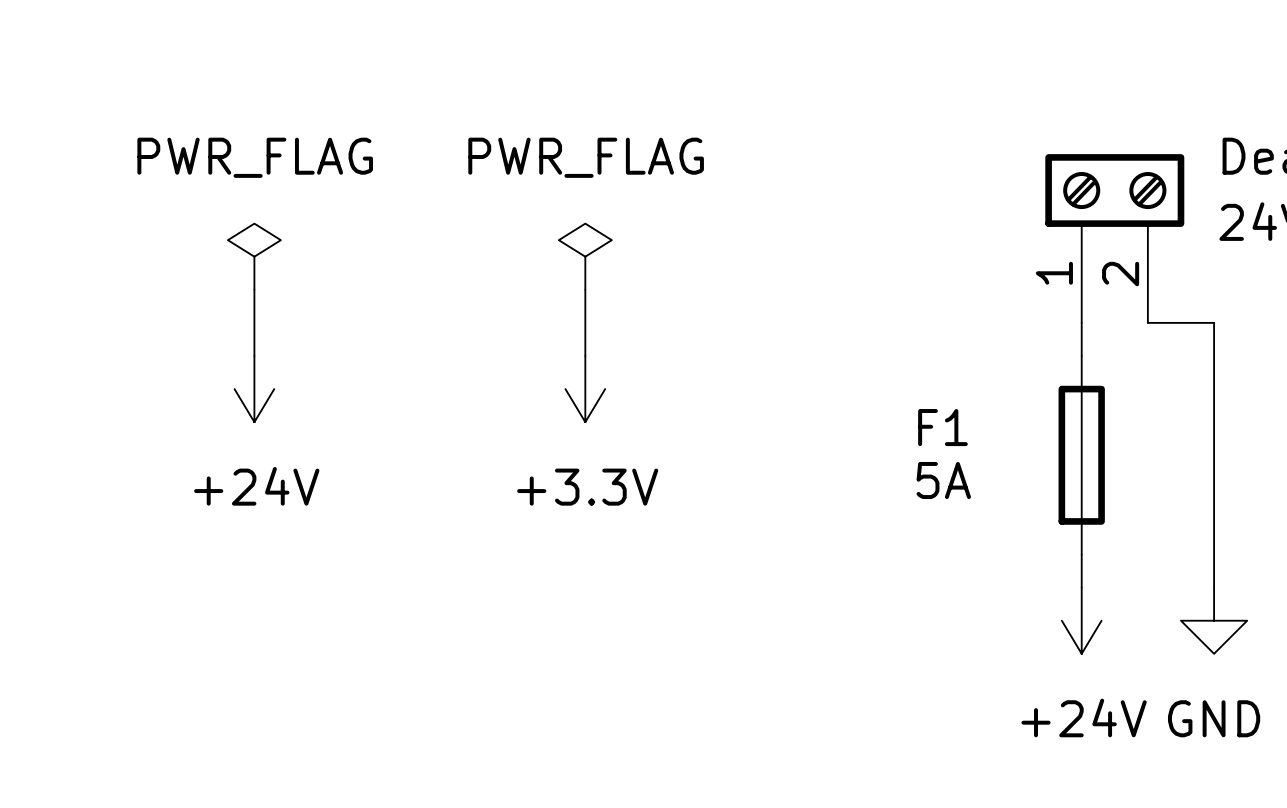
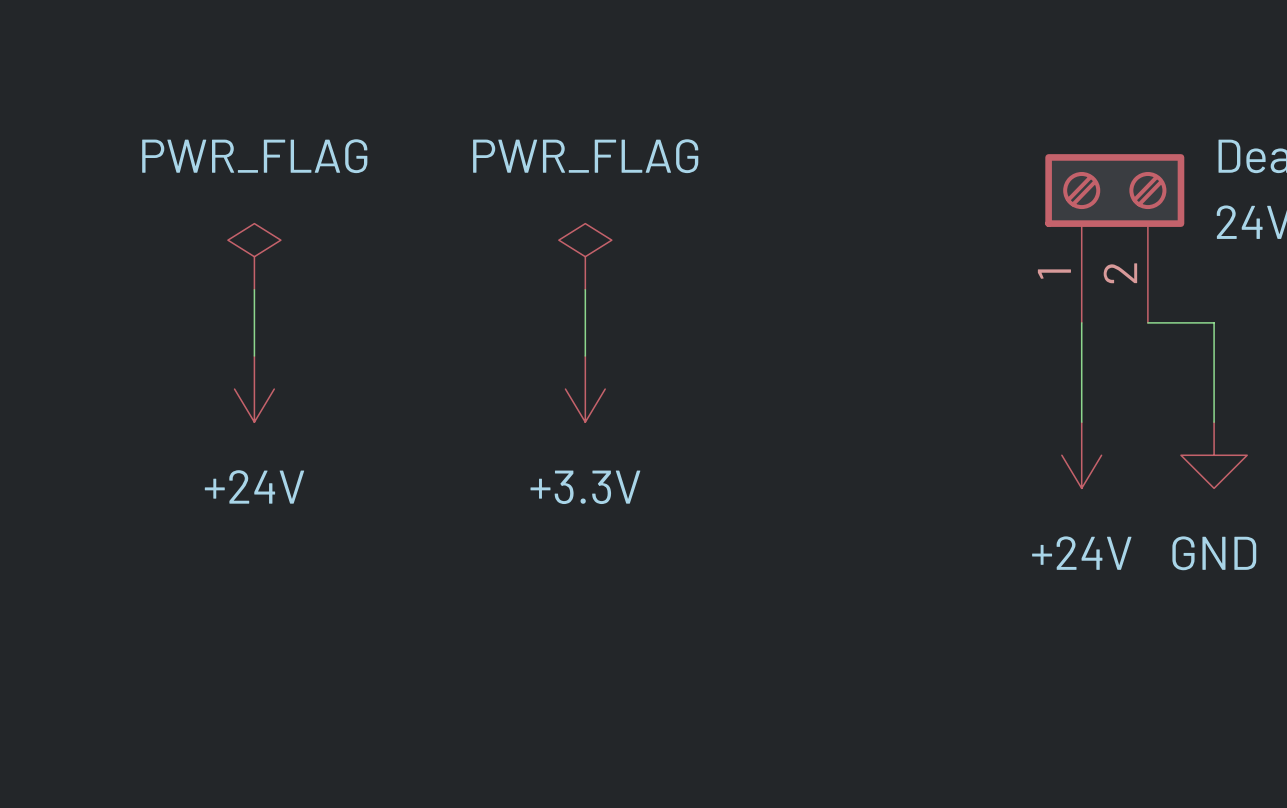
wire: (1214, 422) (1214, 587) -> none
F1: 5A (1081, 455) -> none
wire: (1081, 554) (1081, 587) -> none
power symbol position: +24V (1081, 620) -> +24V (1081, 455)
power symbol position: GND (1214, 620) -> GND (1214, 455)

